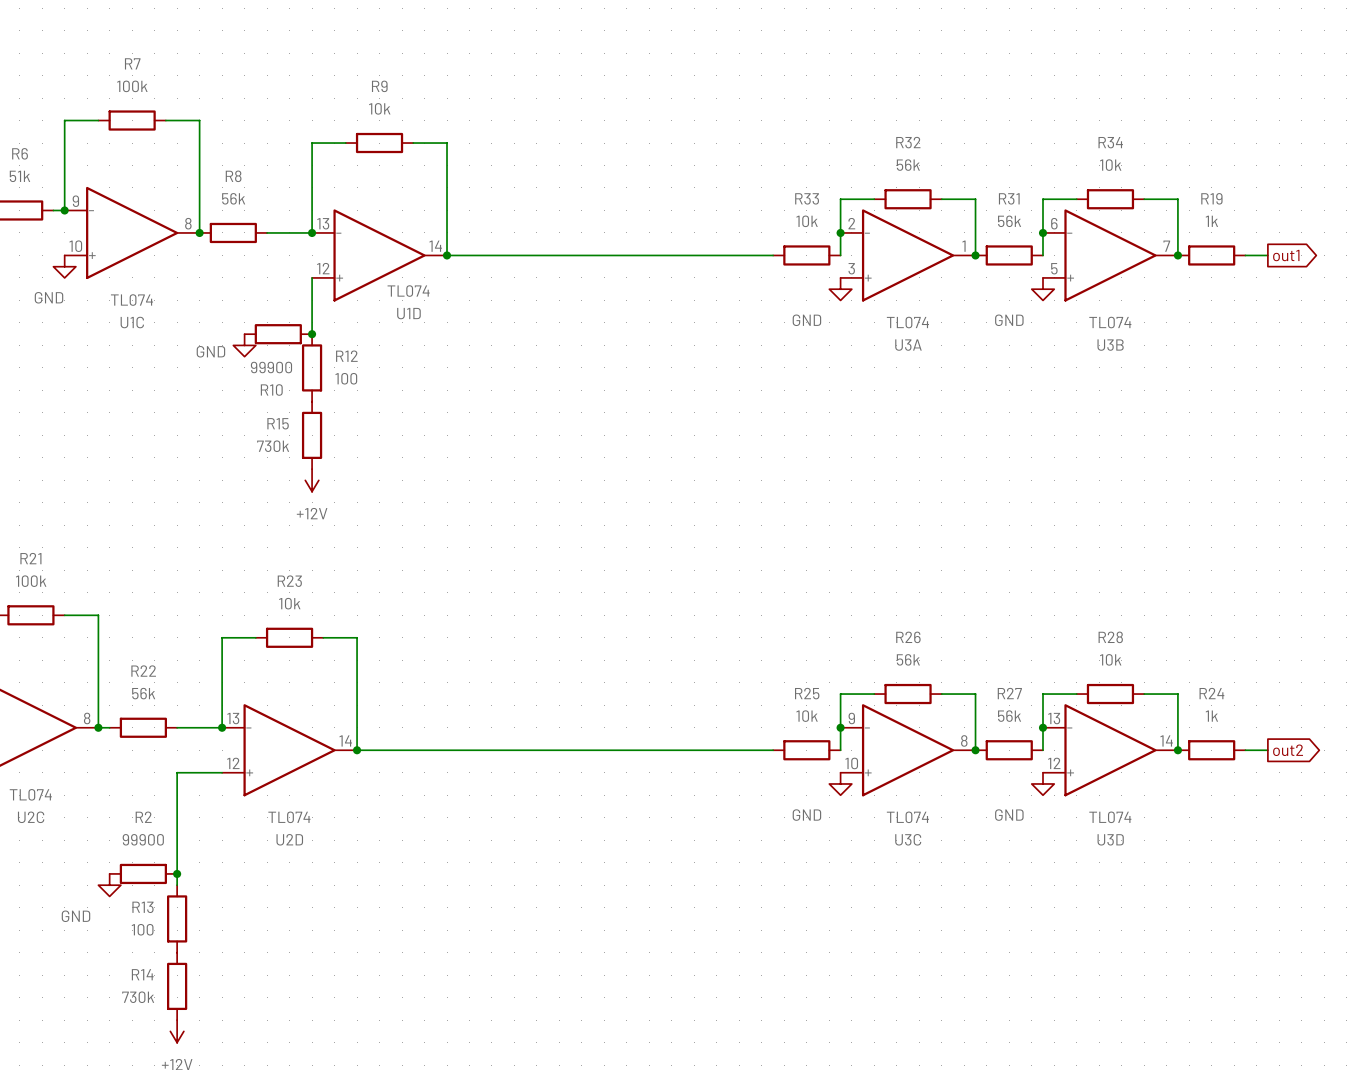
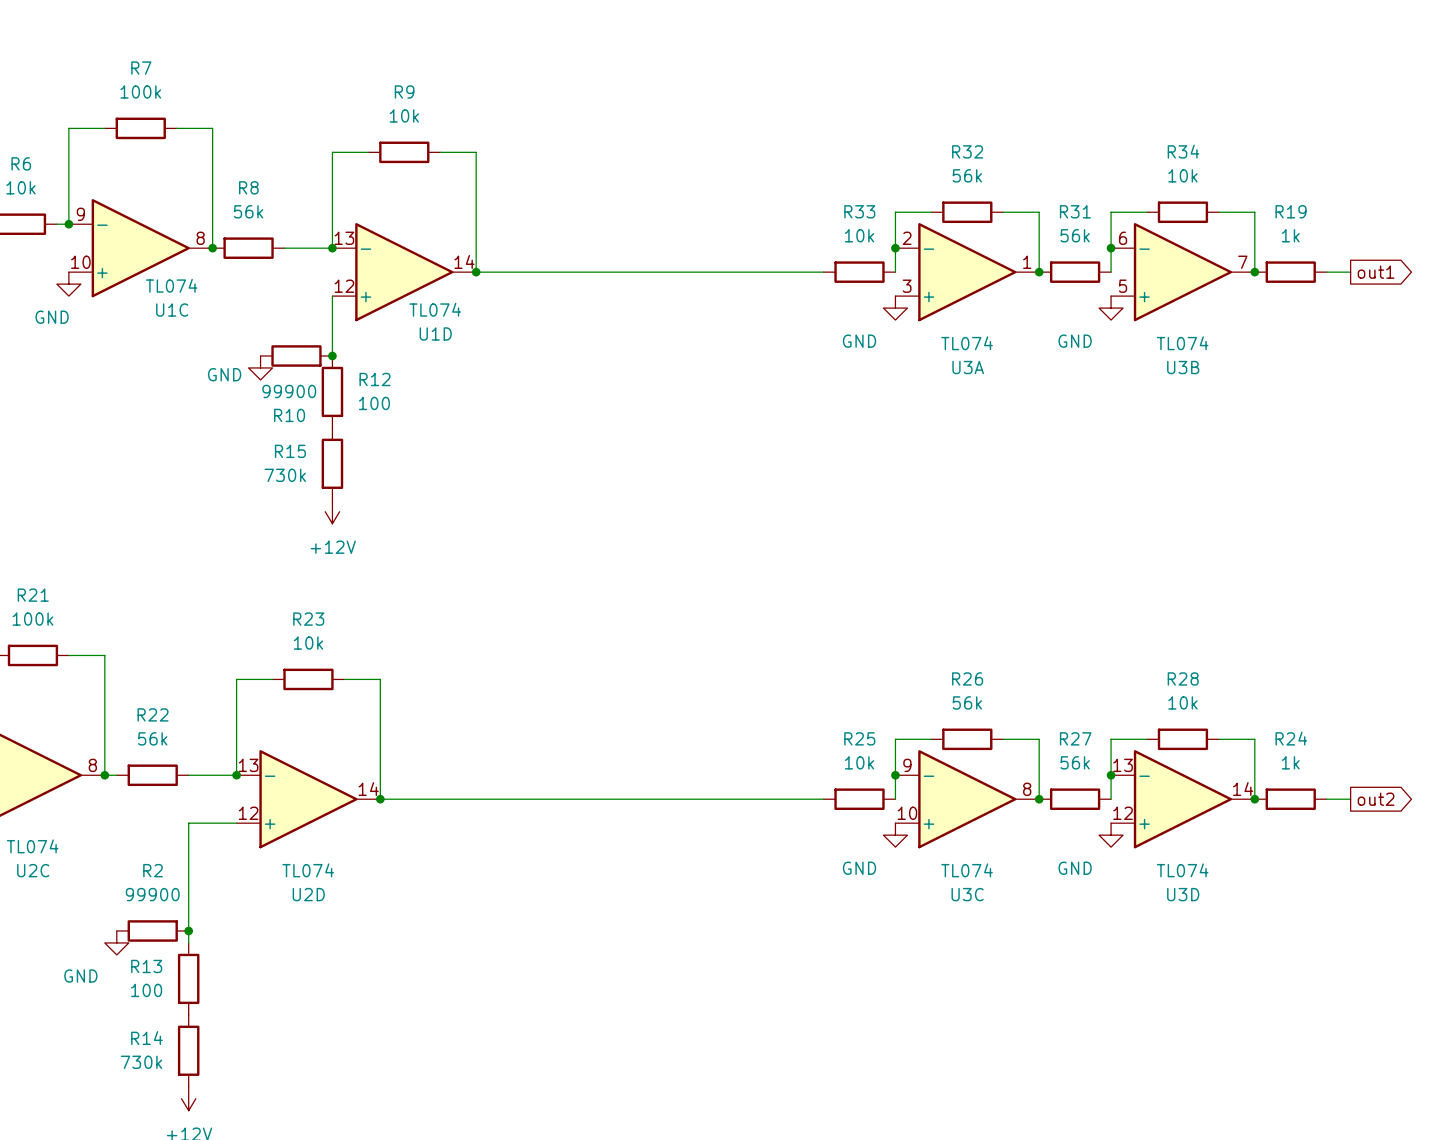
R6 value: 51k (19, 176) -> 10k (20, 187)
U1C value position: TL074 (131, 300) -> TL074 (171, 285)
U1C name position: U1C (132, 322) -> U1C (172, 310)

